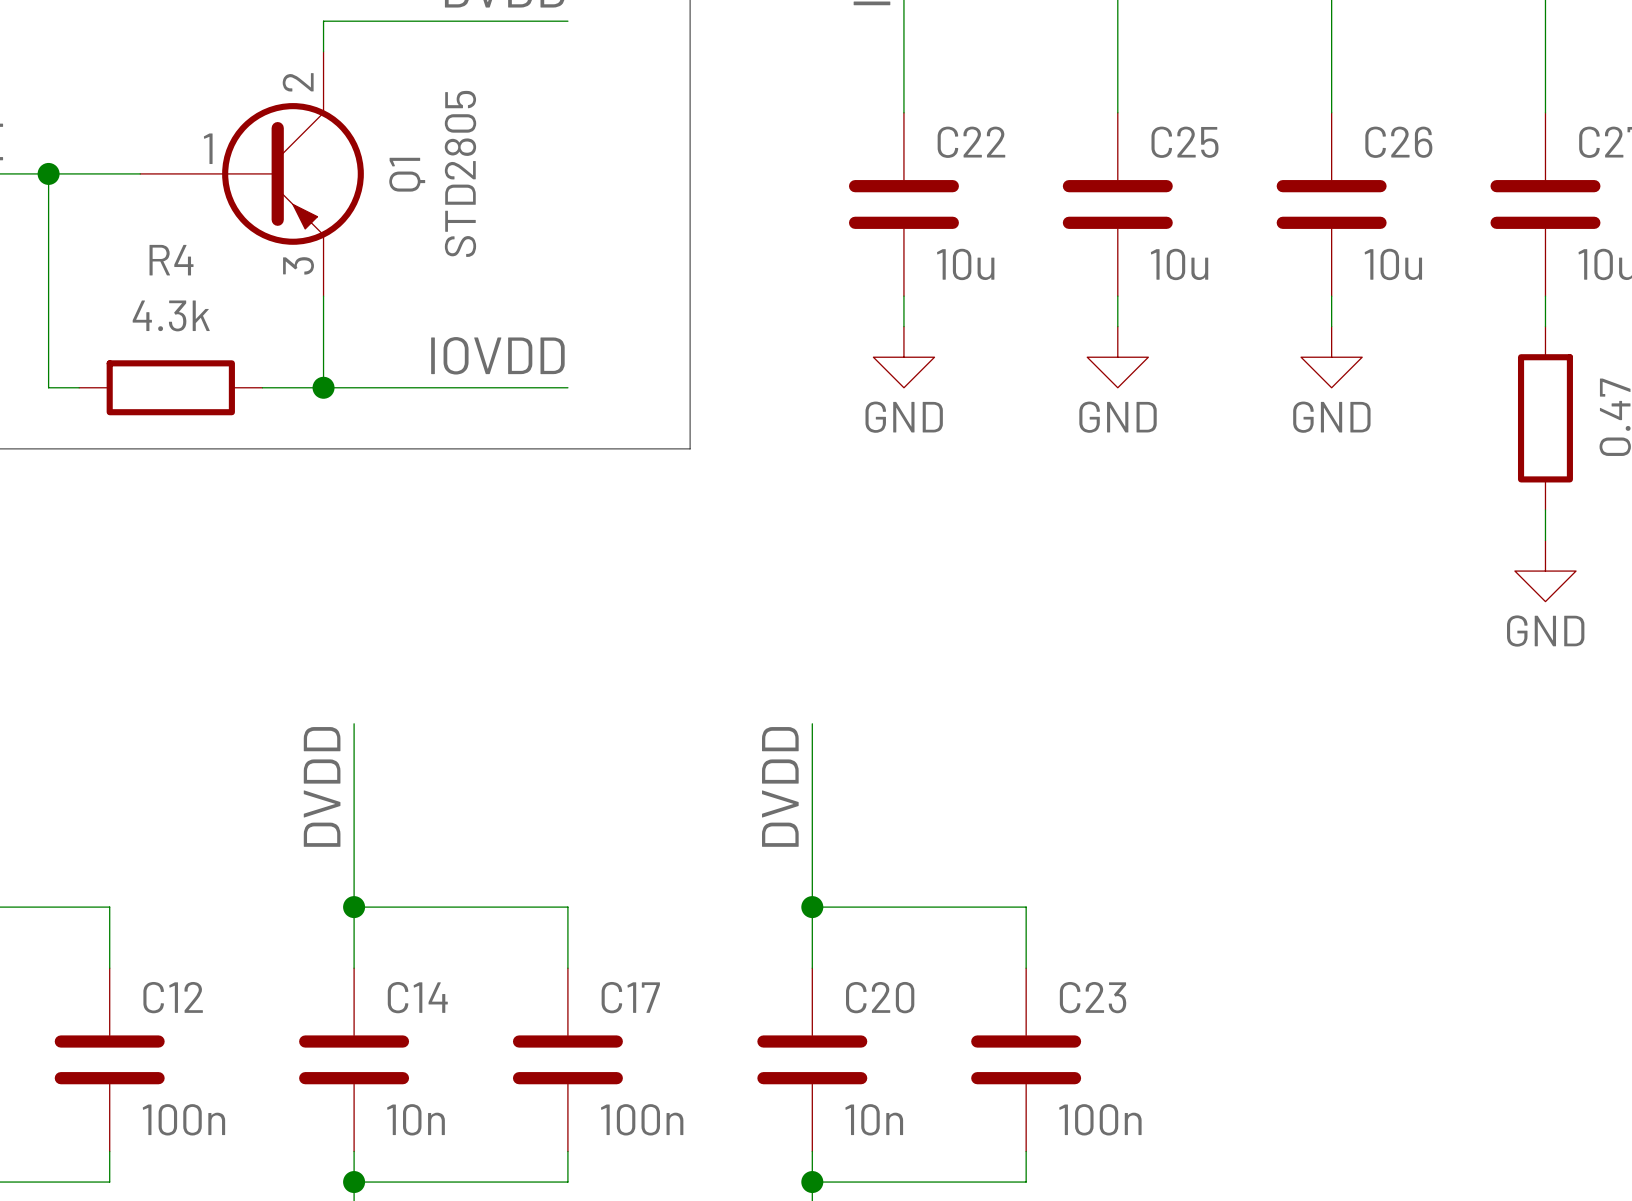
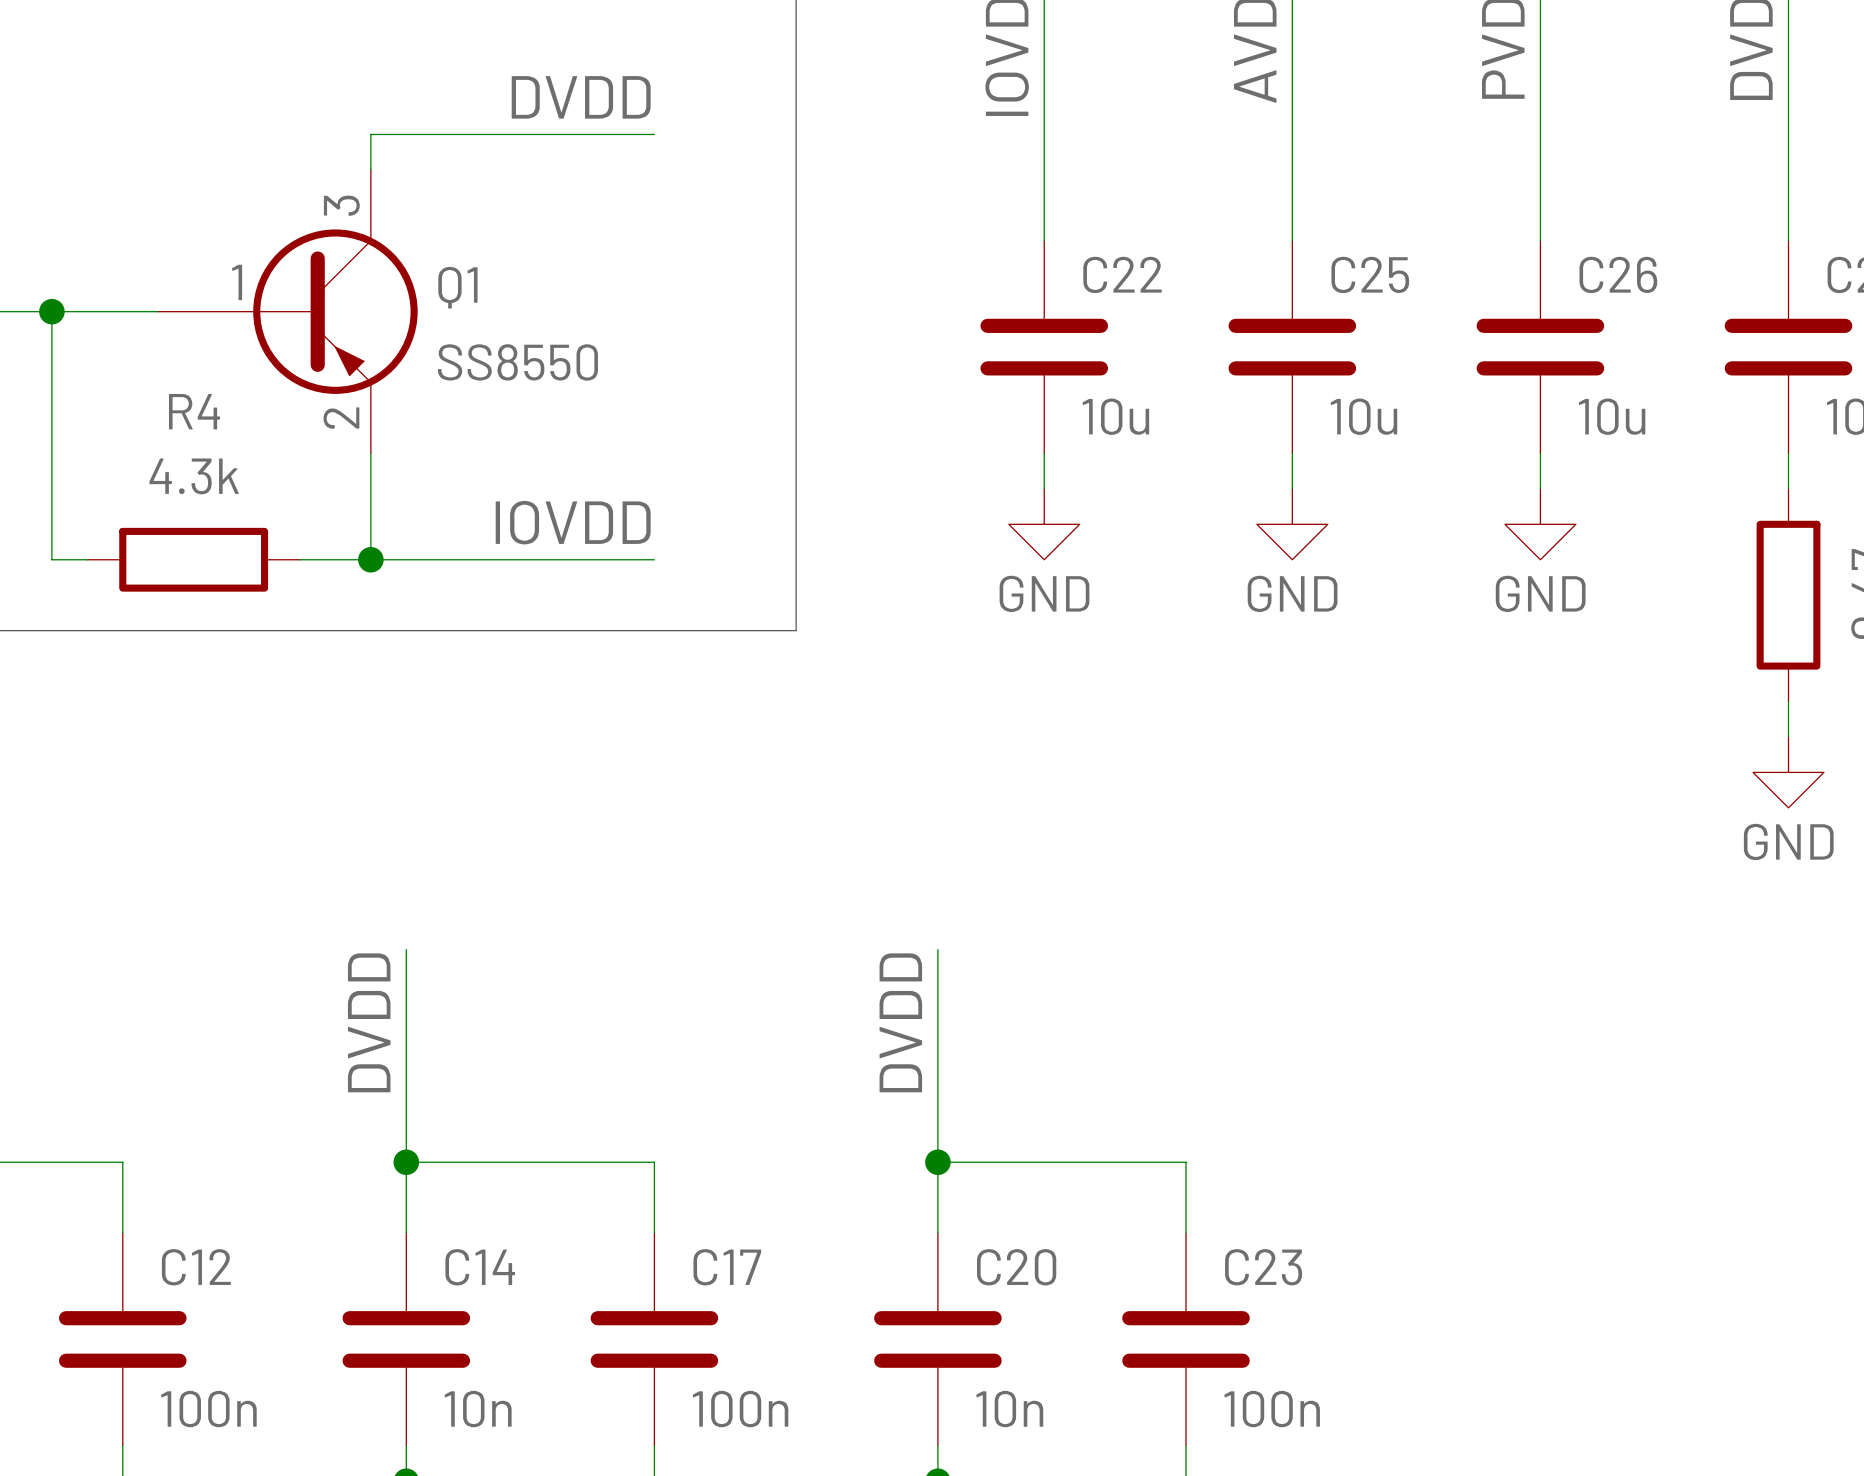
Q1 pin number: 2 (298, 82) -> 3 (341, 205)
Q1 value: STD2805 (460, 173) -> SS8550 (517, 362)
Q1 name rotation: 0° (407, 174) -> 90° clockwise (457, 287)
Q1 pin number: 3 (298, 265) -> 2 (341, 418)

